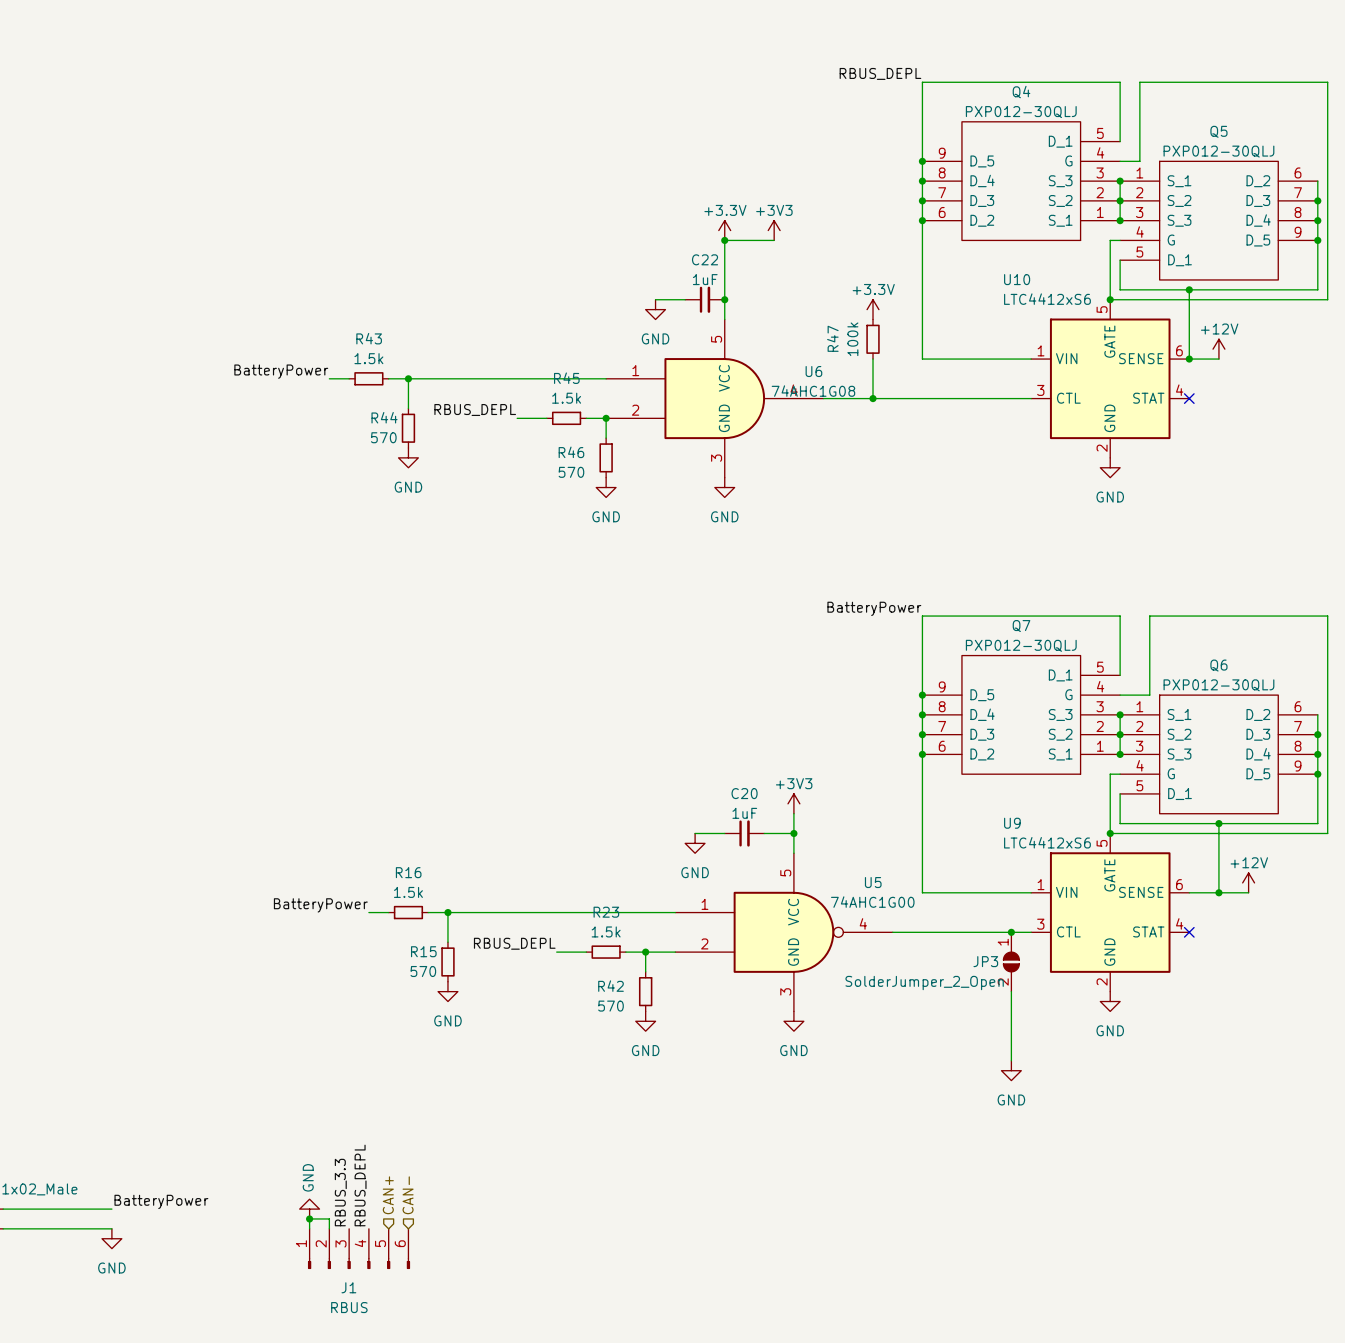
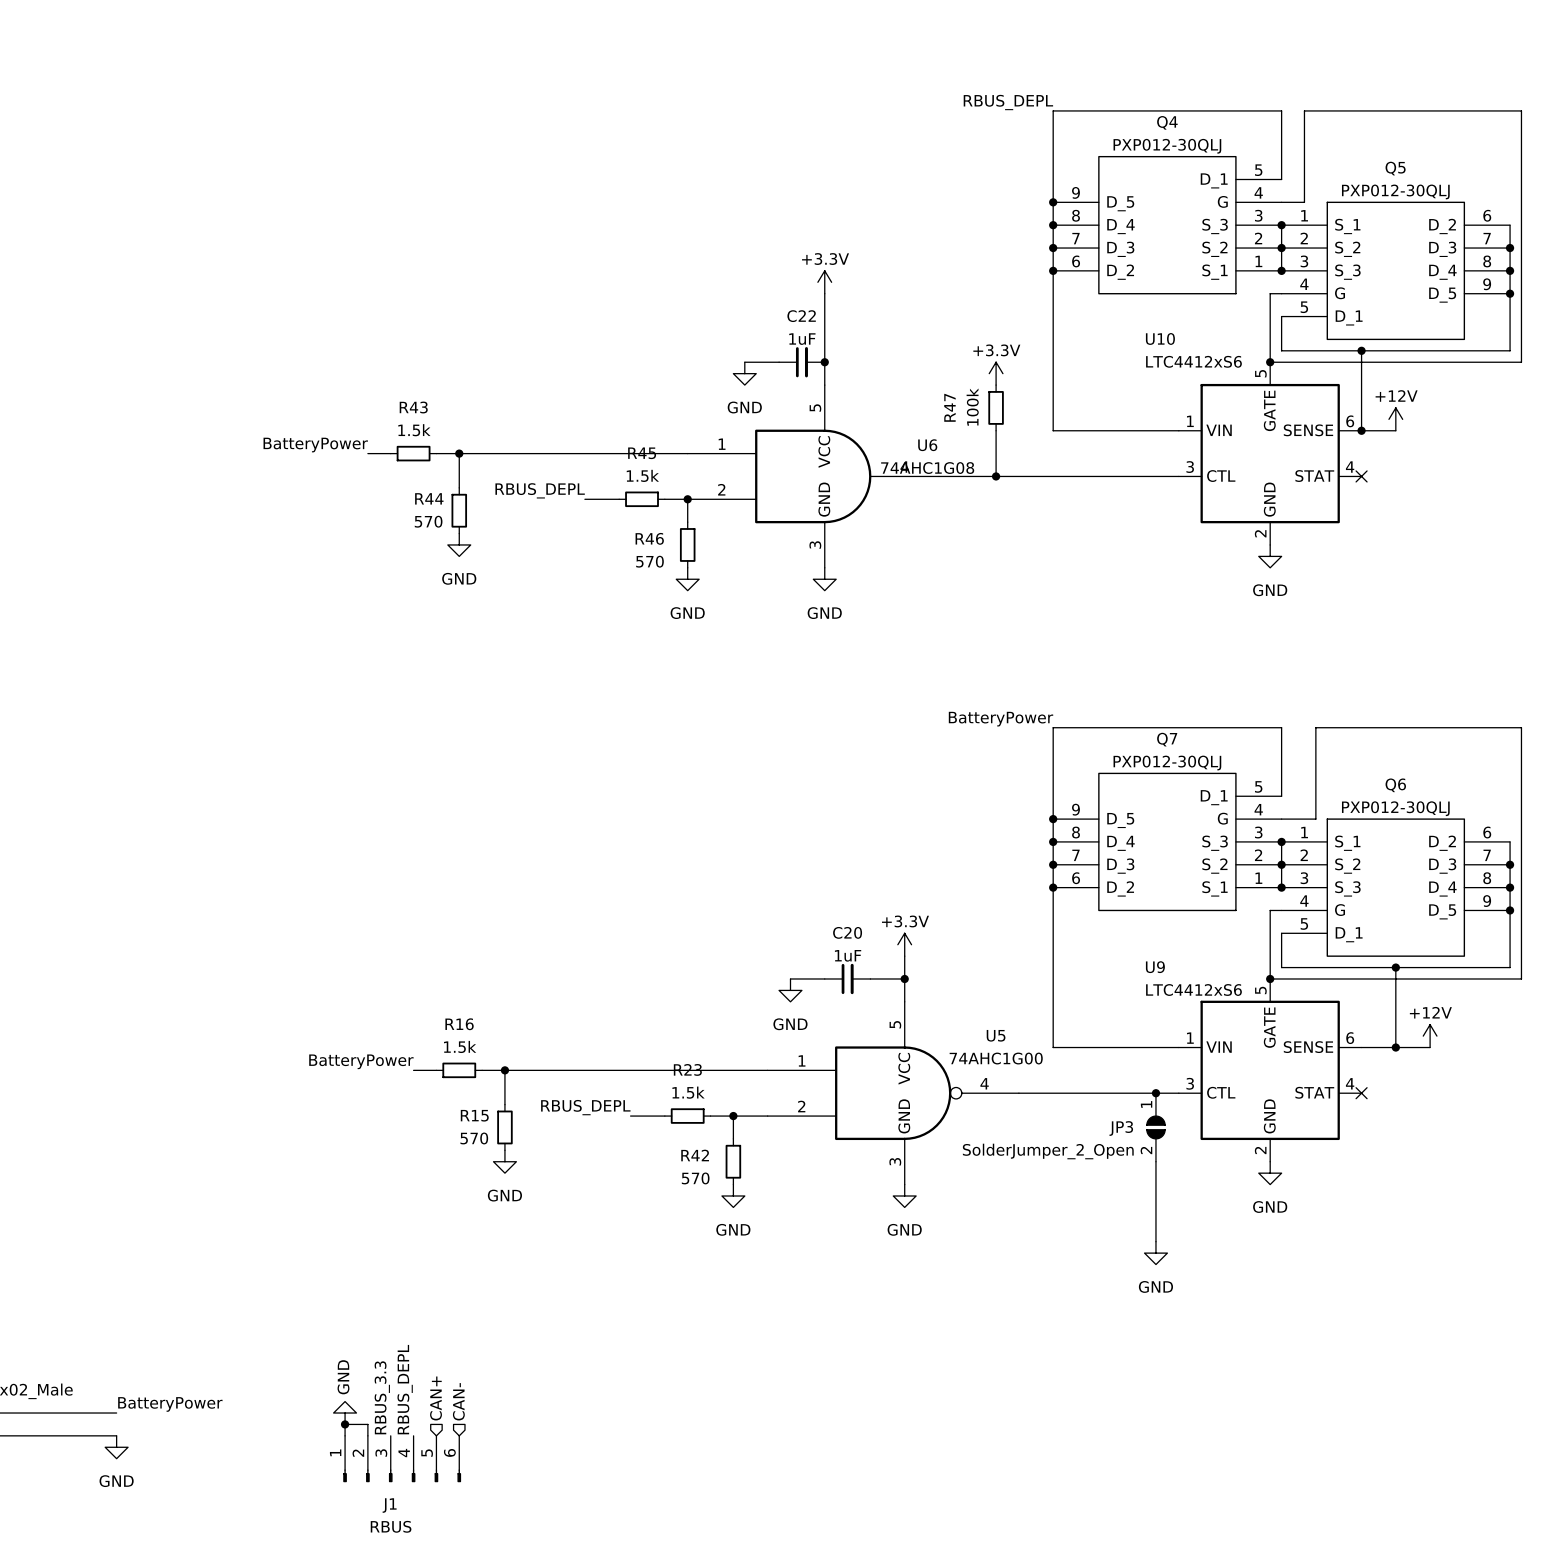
power symbol: +3V3 (774, 230) -> none
wire: (724, 240) (774, 240) -> none
junction: (724, 240) -> none
power symbol: +3V3 (793, 803) -> +3.3V (904, 944)

